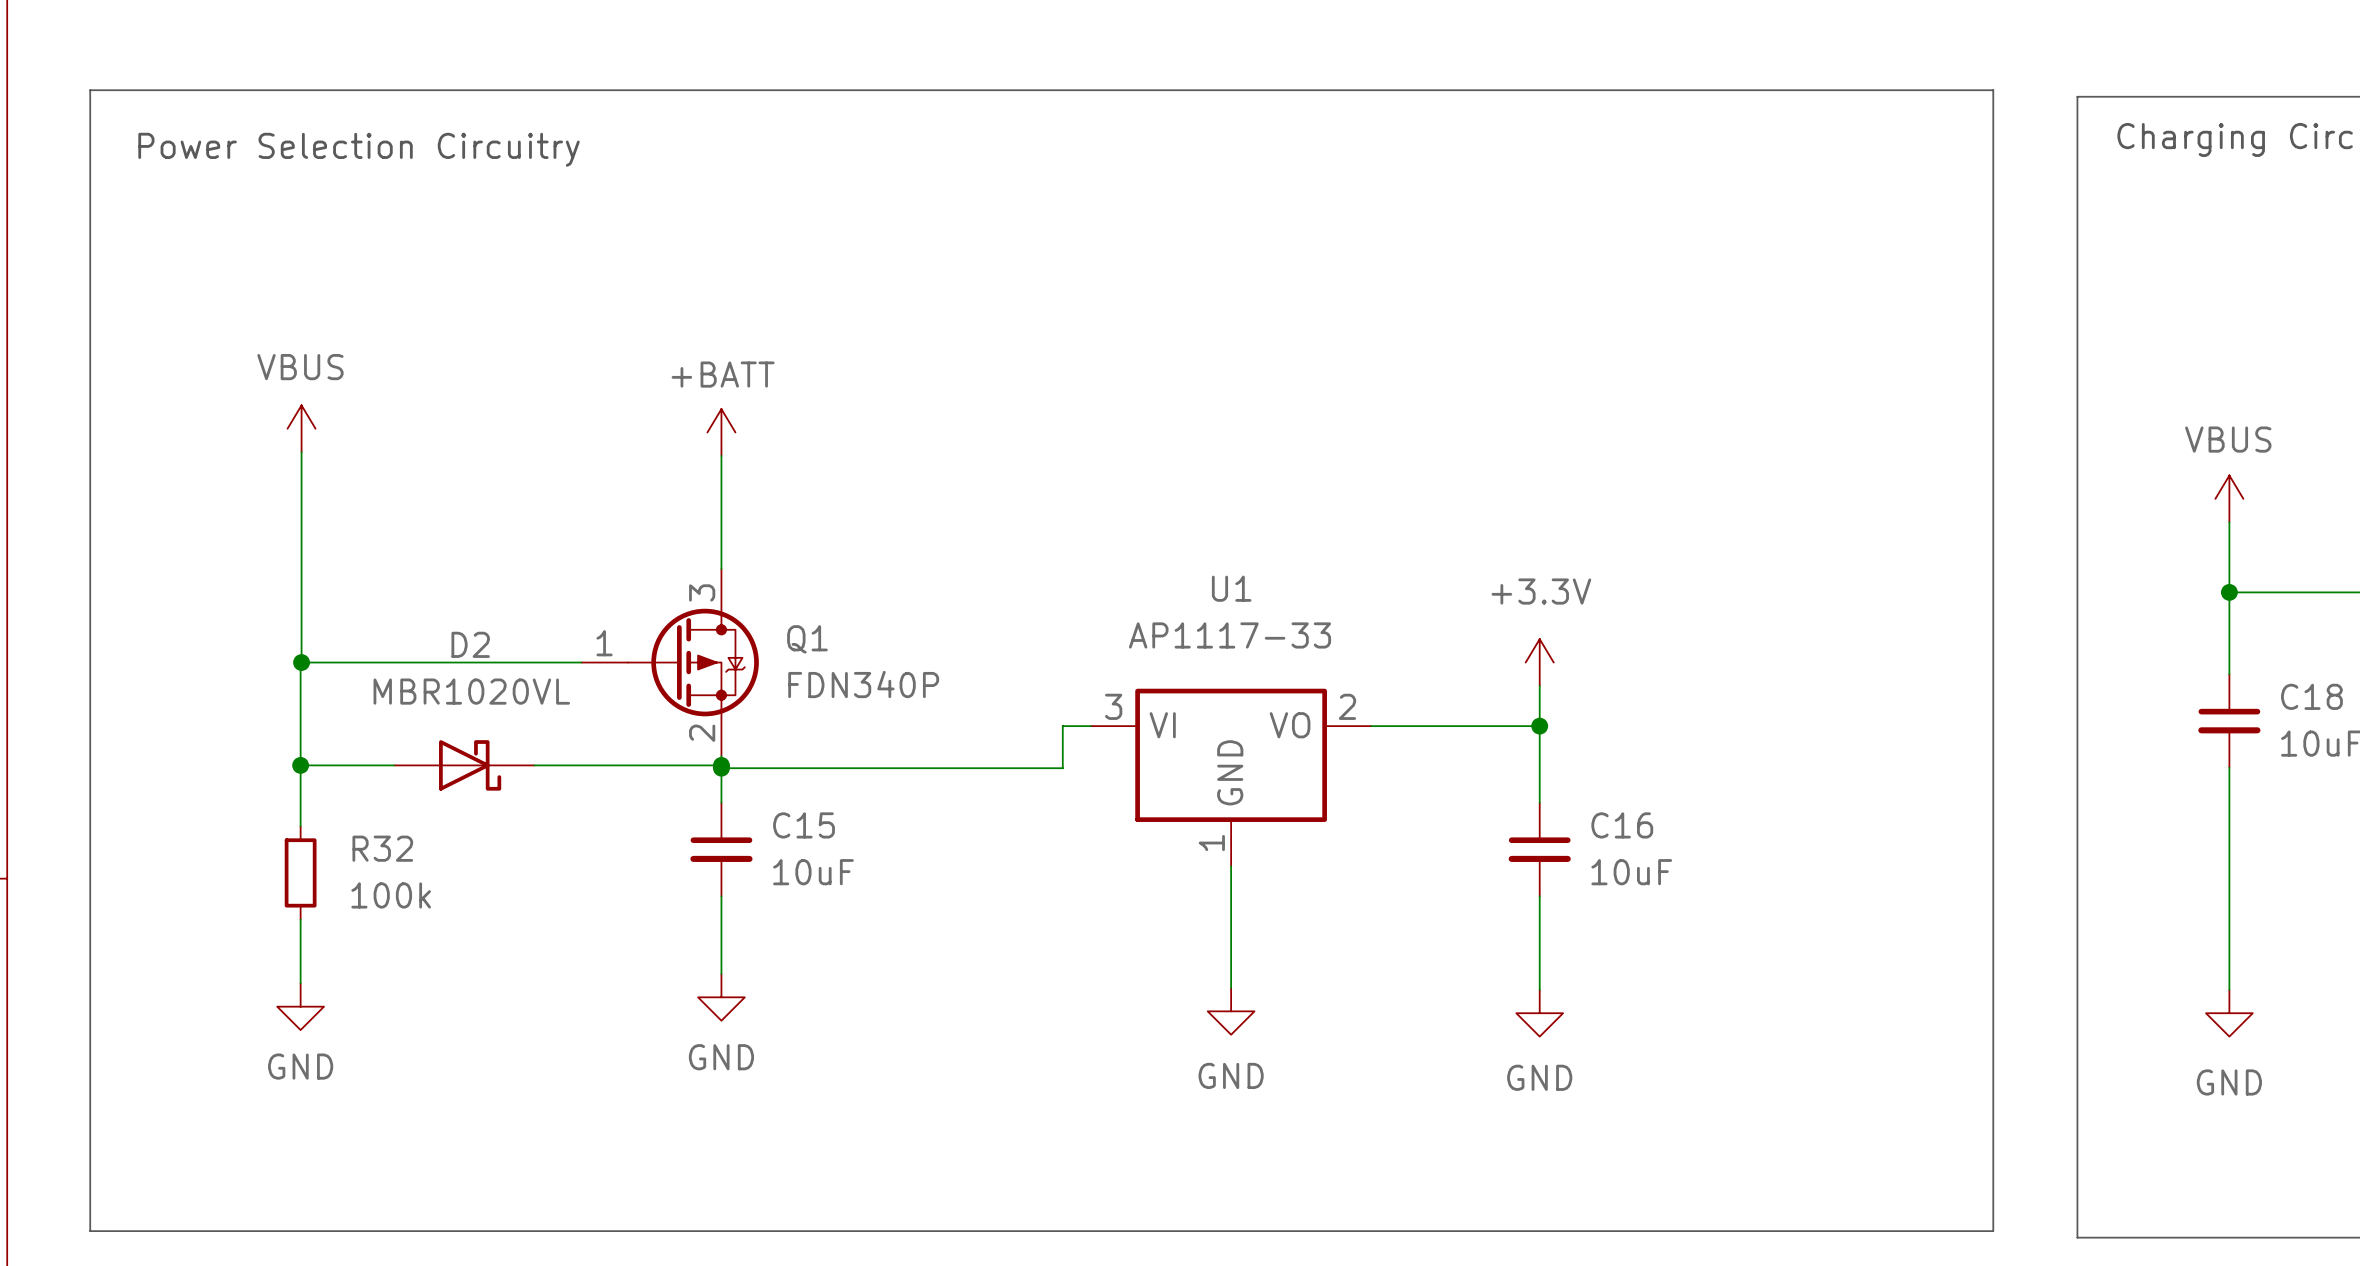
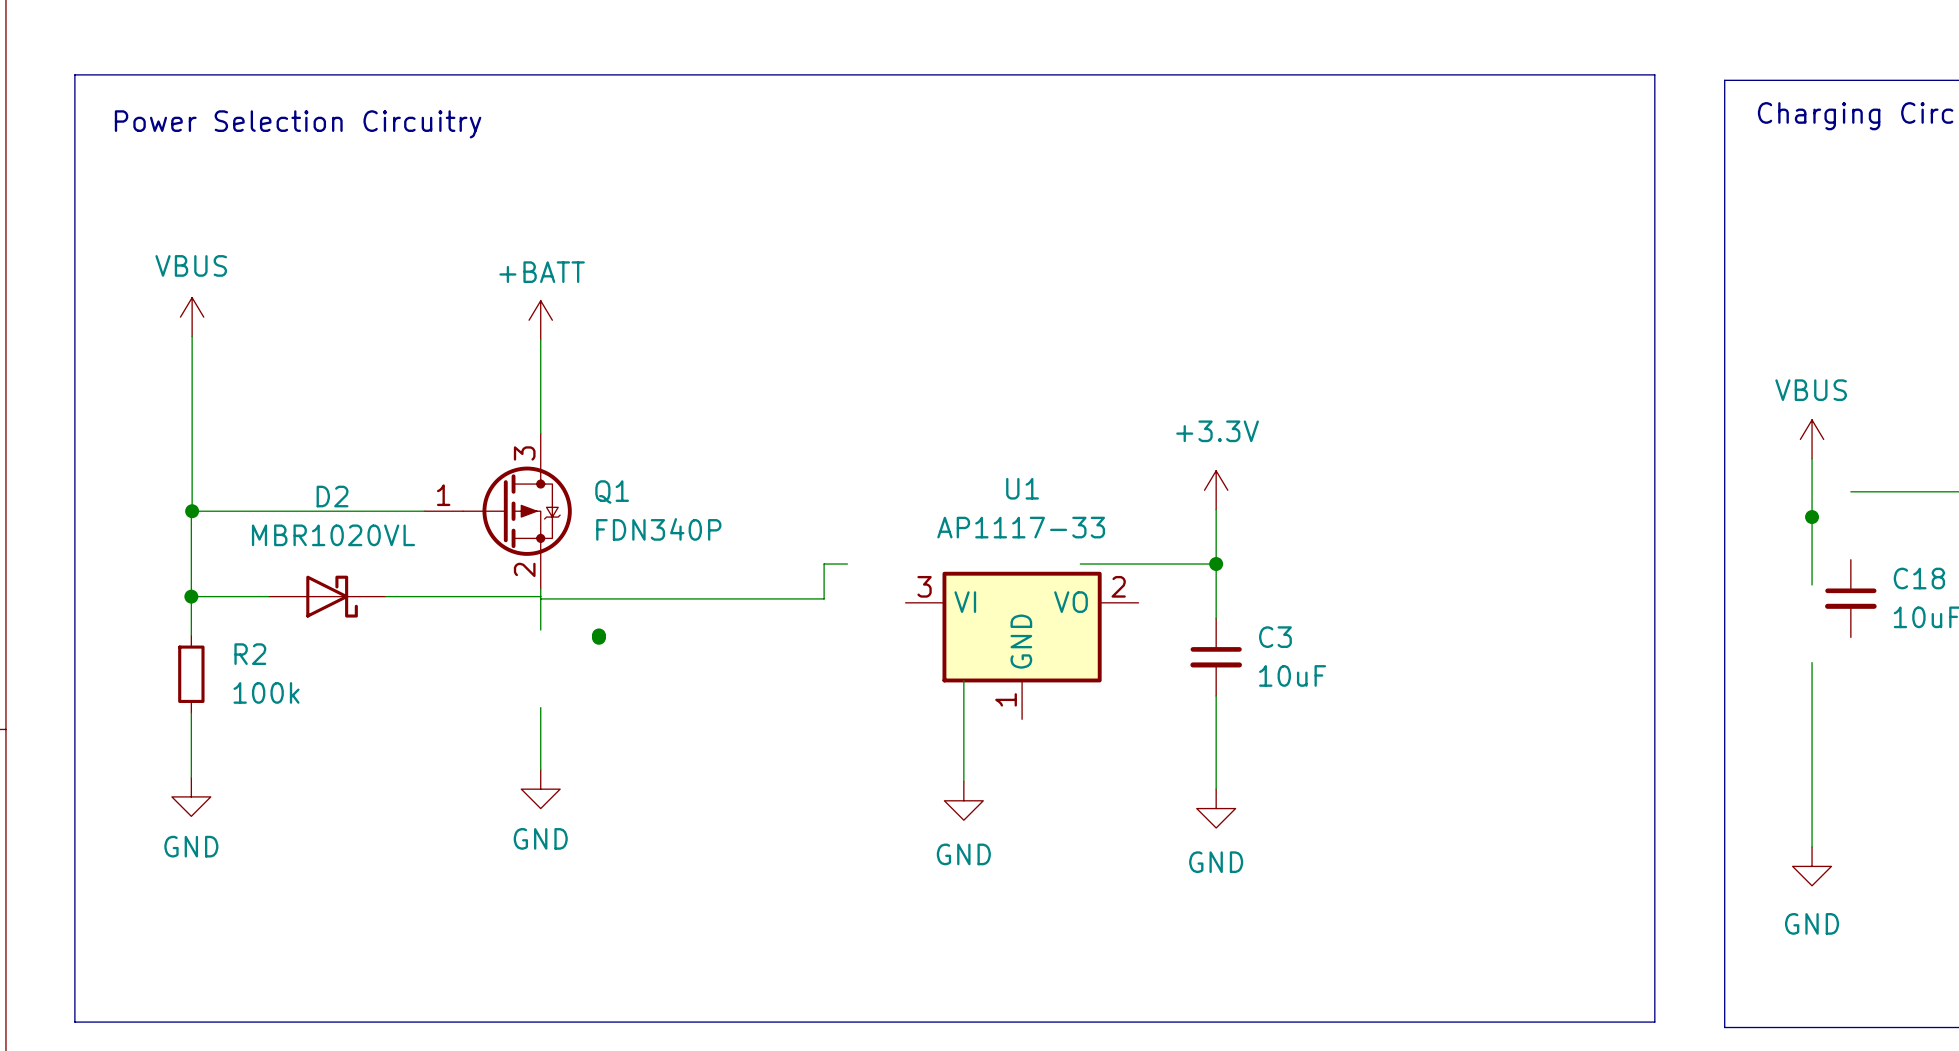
power symbol position: VBUS (301, 428) -> VBUS (192, 317)
power symbol position: +BATT (721, 432) -> +BATT (540, 320)
wire: (301, 452) (301, 662) -> (192, 336) (192, 511)
wire: (721, 455) (721, 569) -> (540, 339) (540, 433)
power symbol position: VBUS (2229, 498) -> VBUS (1812, 439)
wire: (2229, 522) (2229, 674) -> (1812, 458) (1812, 584)
junction position: (2229, 592) -> (1812, 517)
wire: none -> (1216, 509) (1216, 618)
junction: none -> (192, 511)
wire: none -> (424, 511) (191, 511) (191, 635)
junction: (301, 662) -> none
wire: (581, 662) (300, 662) (300, 826) -> none
Q1 position: (670, 662) -> (498, 511)
power symbol position: +3.3V (1539, 662) -> +3.3V (1216, 490)
wire: none -> (1080, 564) (1216, 564)
wire: (1539, 685) (1539, 802) -> none
wire: none -> (540, 588) (540, 630)
junction: none -> (191, 596)
wire: (1090, 726) (1062, 726) (1062, 768) (721, 768) -> (847, 564) (824, 564) (824, 598) (540, 598)
wire: (1371, 726) (1539, 726) -> none
junction position: (1539, 726) -> (1216, 564)
wire: (721, 756) (721, 802) -> none
wire: (300, 765) (394, 765) -> (191, 596) (268, 596)
junction: (300, 765) -> none
D2 position: (464, 765) -> (327, 596)
wire: (534, 765) (721, 765) -> (385, 596) (540, 596)
wire: (2229, 767) (2229, 989) -> (1812, 662) (1812, 847)
C3: none -> 10uF (1216, 657)
R2: none -> 100k (191, 674)
wire: none -> (1216, 695) (1216, 789)
C15: 10uF (721, 849) -> none
C16: 10uF (1539, 849) -> none
wire: none -> (540, 707) (540, 769)
wire: none -> (191, 713) (191, 777)
wire: (1231, 866) (1231, 987) -> (963, 680) (963, 781)
R32: 100k (300, 872) -> none
wire: (721, 896) (721, 973) -> none
wire: (1539, 896) (1539, 989) -> none
wire: (300, 919) (300, 983) -> none
power symbol position: GND (721, 997) -> GND (540, 789)
power symbol position: GND (300, 1006) -> GND (191, 796)
power symbol position: GND (1231, 1011) -> GND (963, 800)
power symbol position: GND (1539, 1013) -> GND (1216, 808)
power symbol position: GND (2229, 1013) -> GND (1812, 866)

